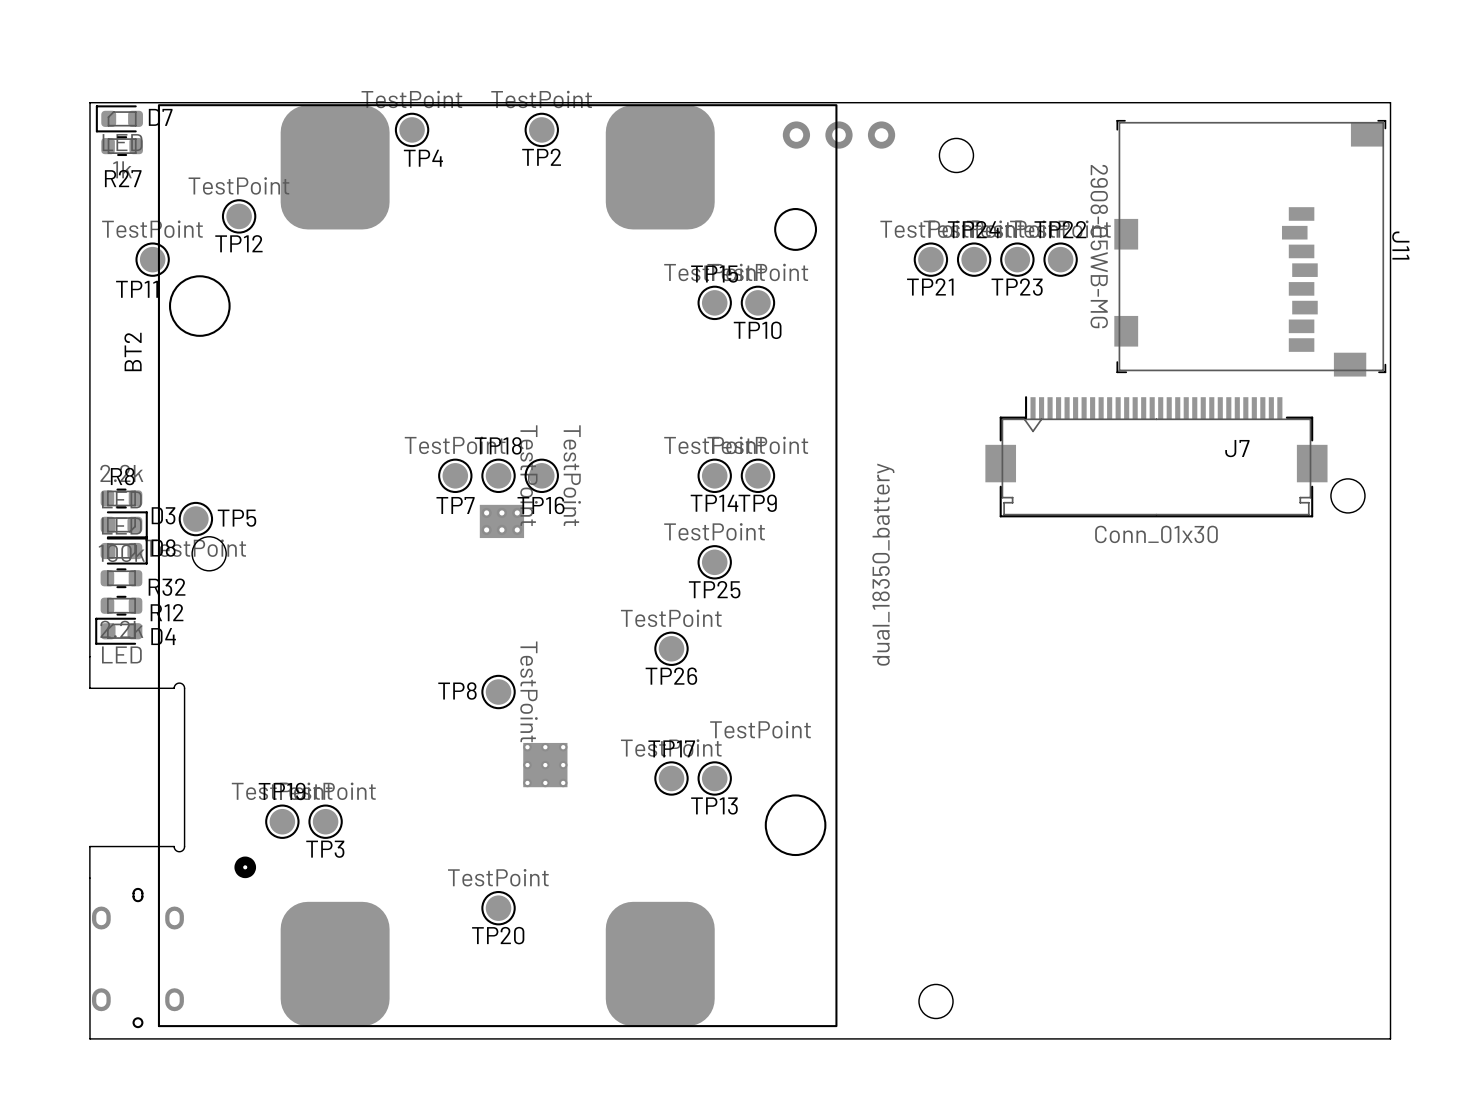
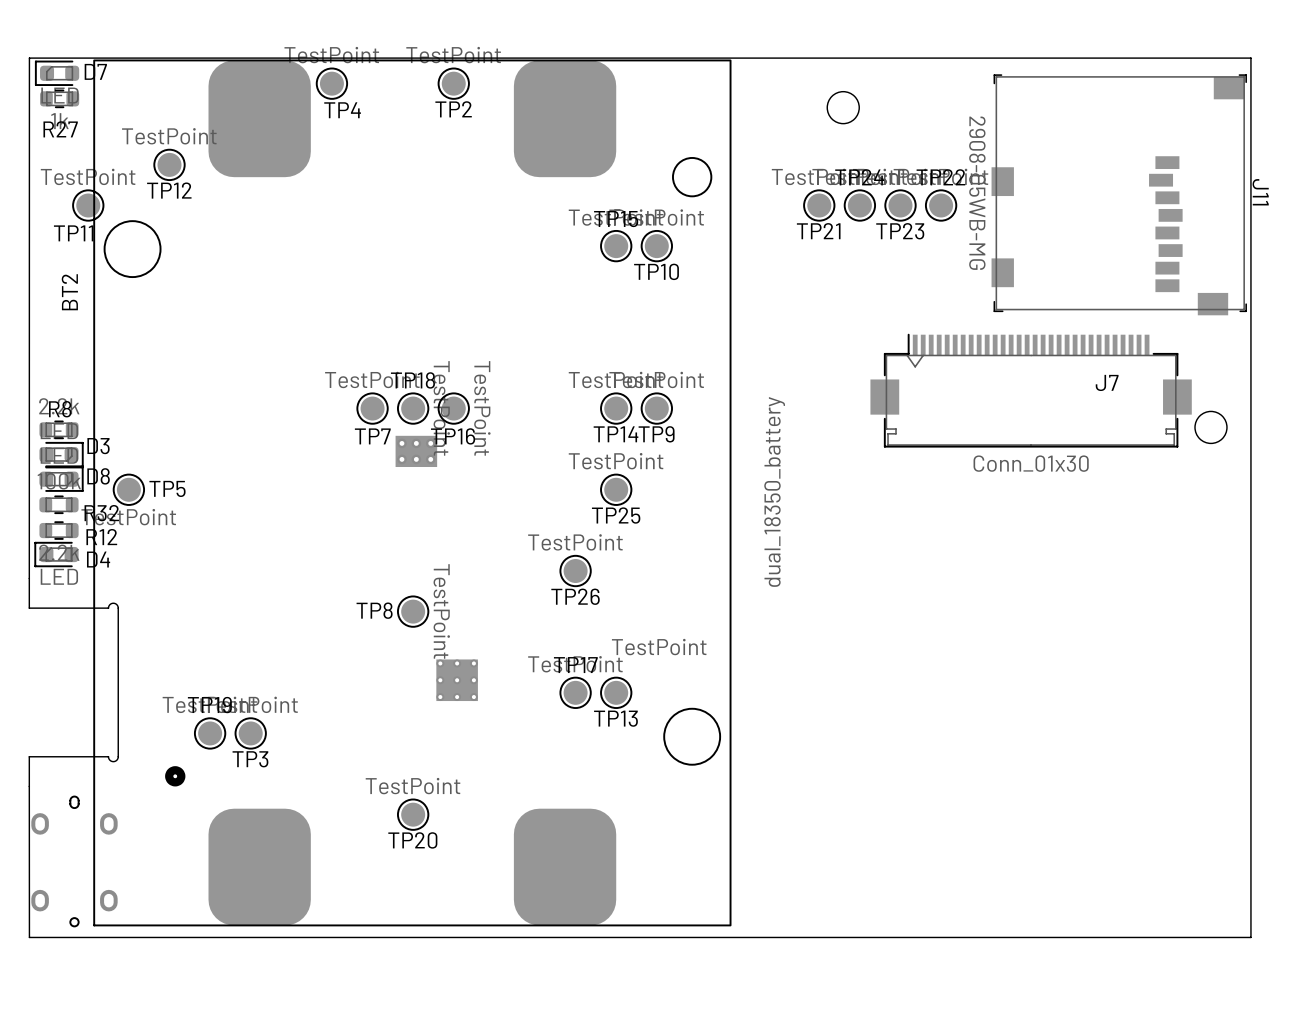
part: (838, 135) -> none
TP5 position: (195, 519) -> (128, 489)
round board edge: [191, 536, 227, 572] -> none
round board edge: [918, 984, 954, 1019] -> none

